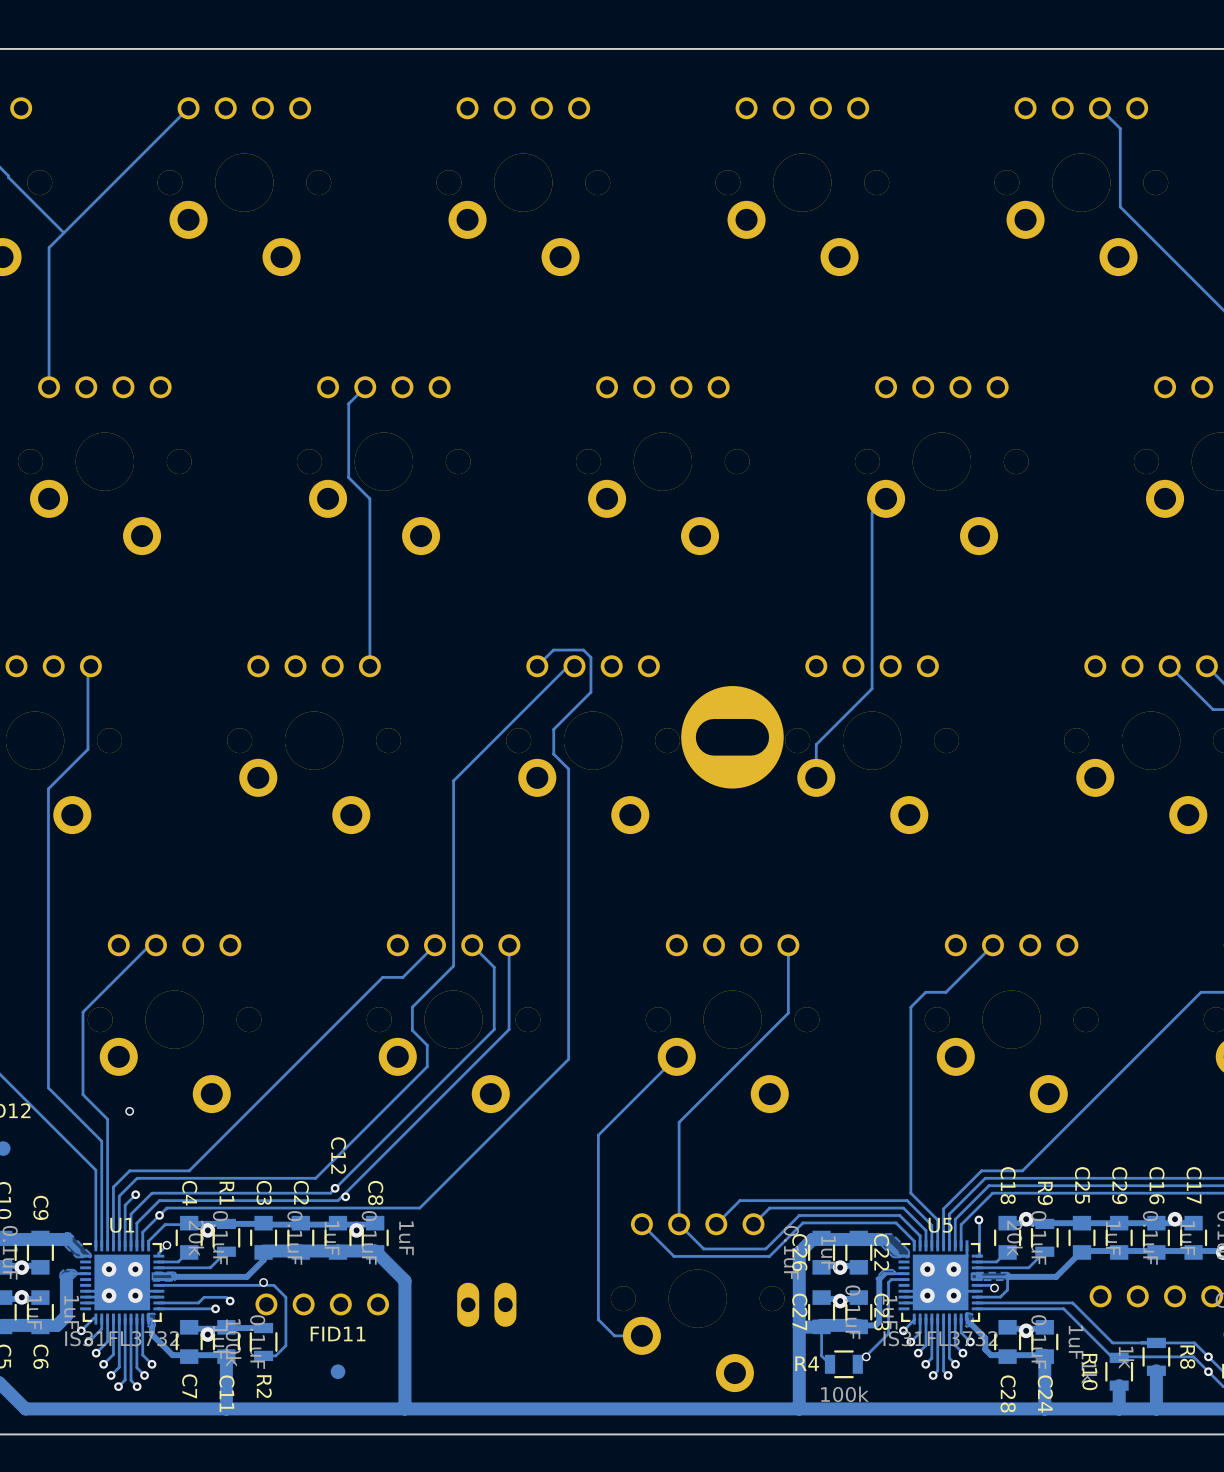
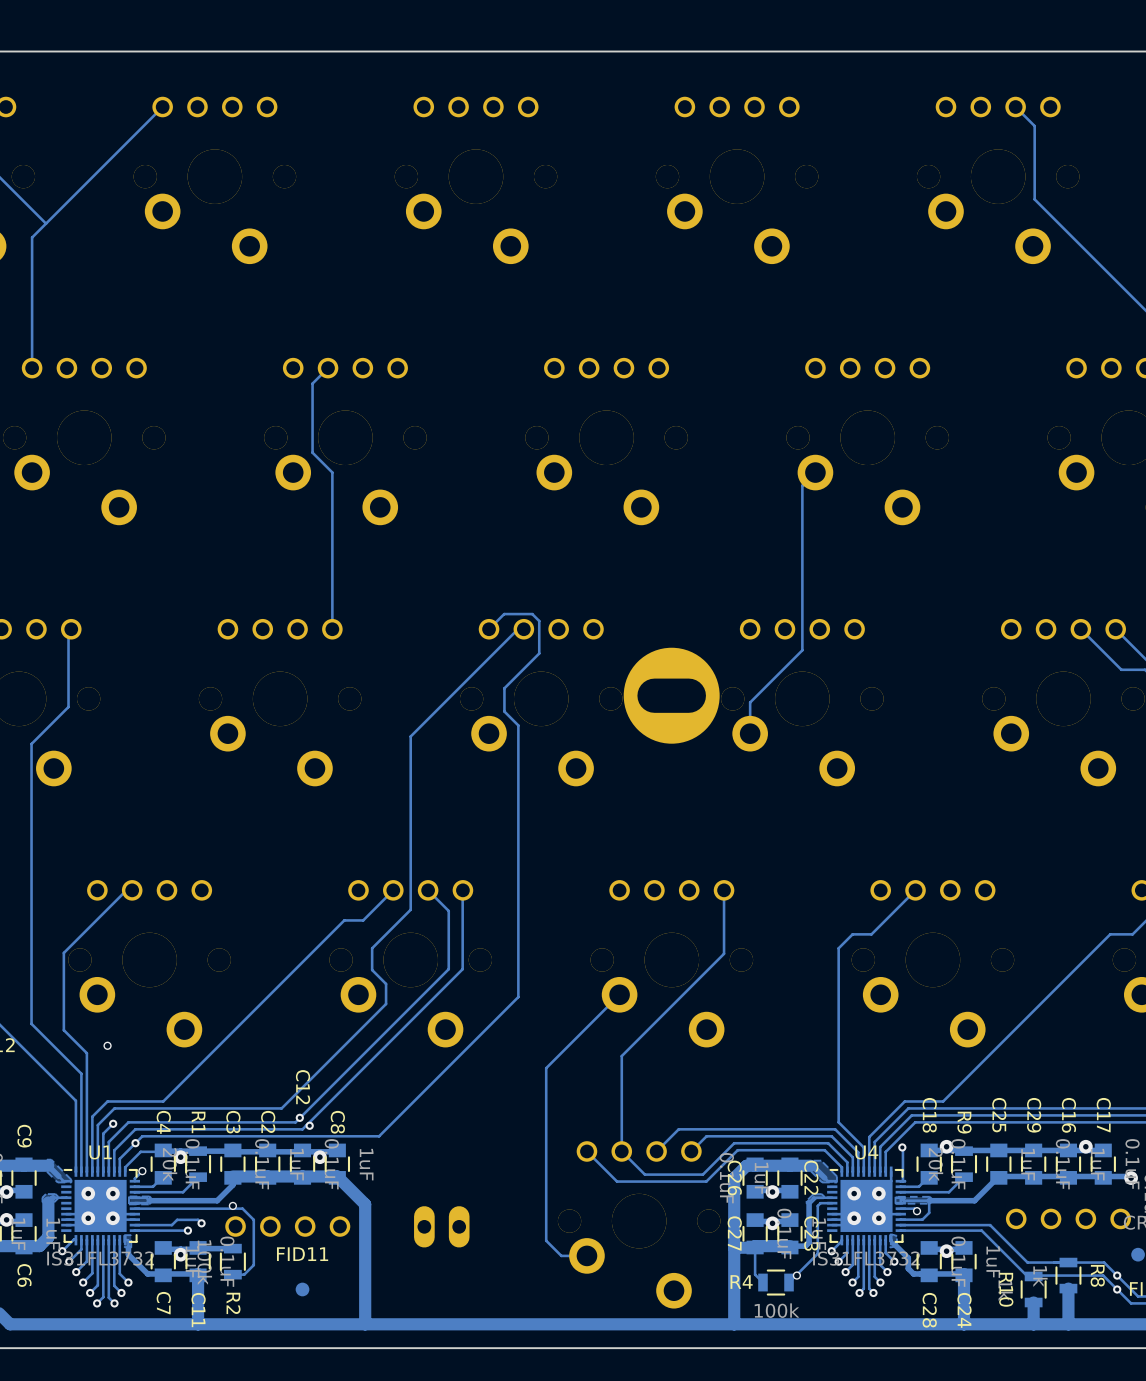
U5 name: U5 (940, 1225) -> U4 (866, 1152)

